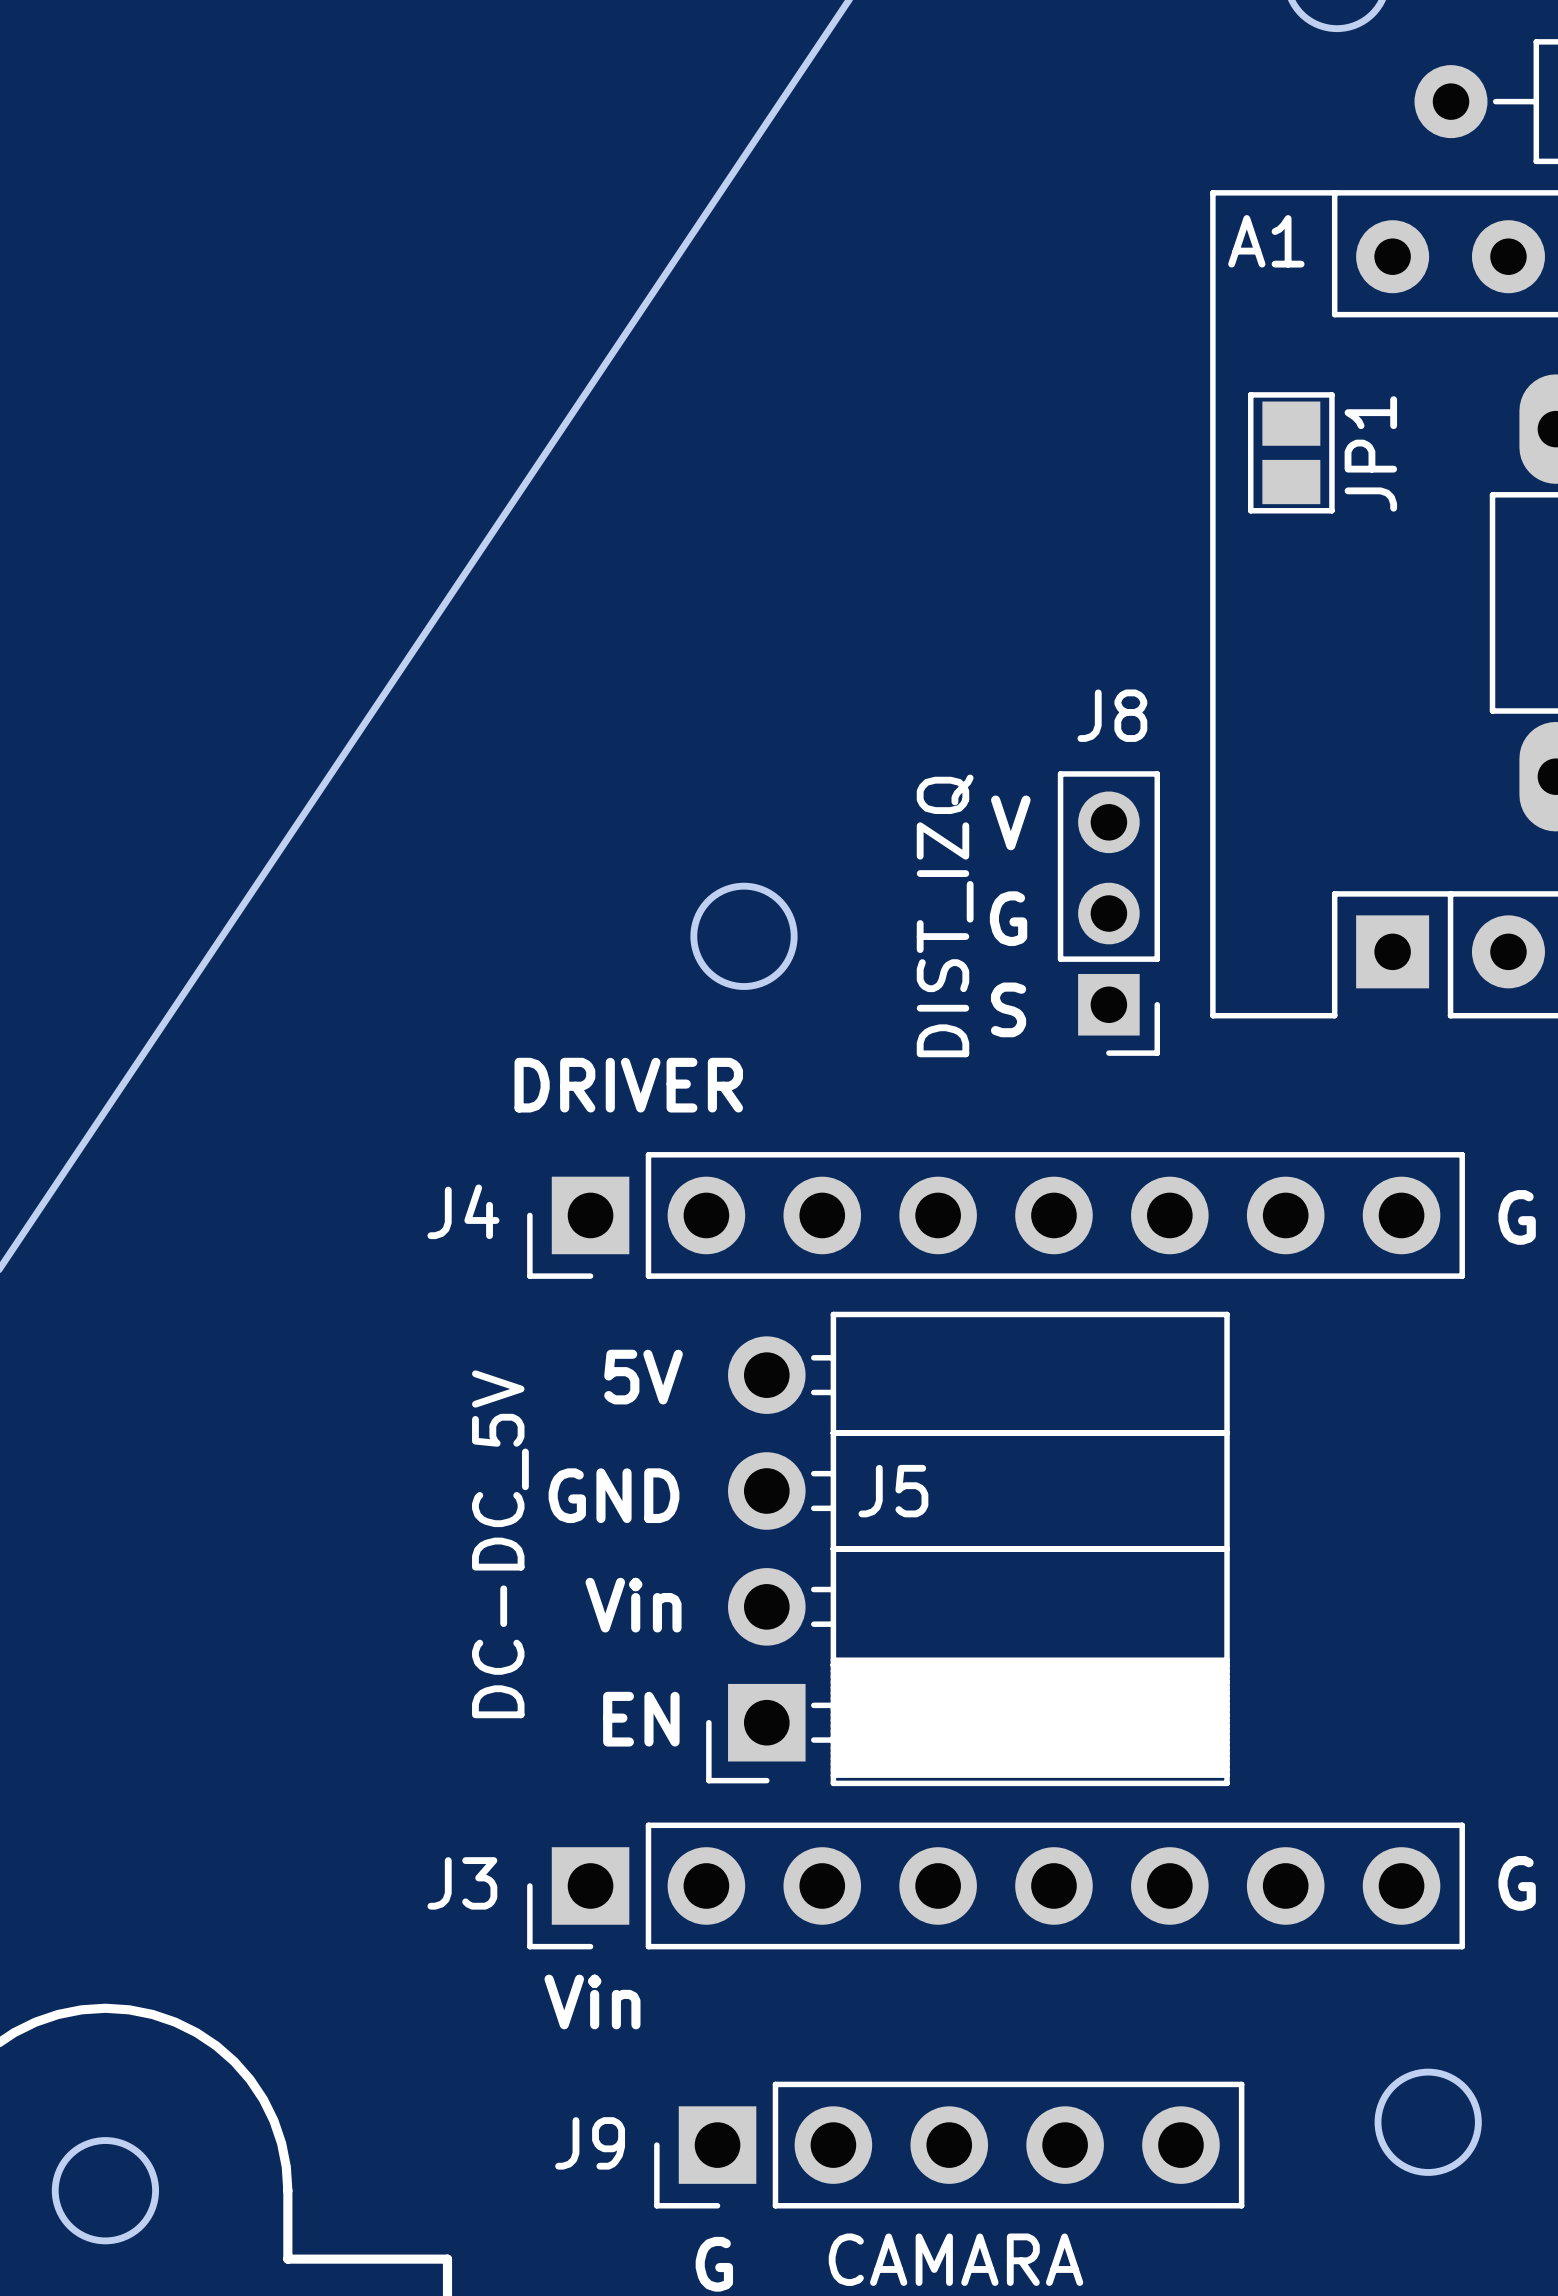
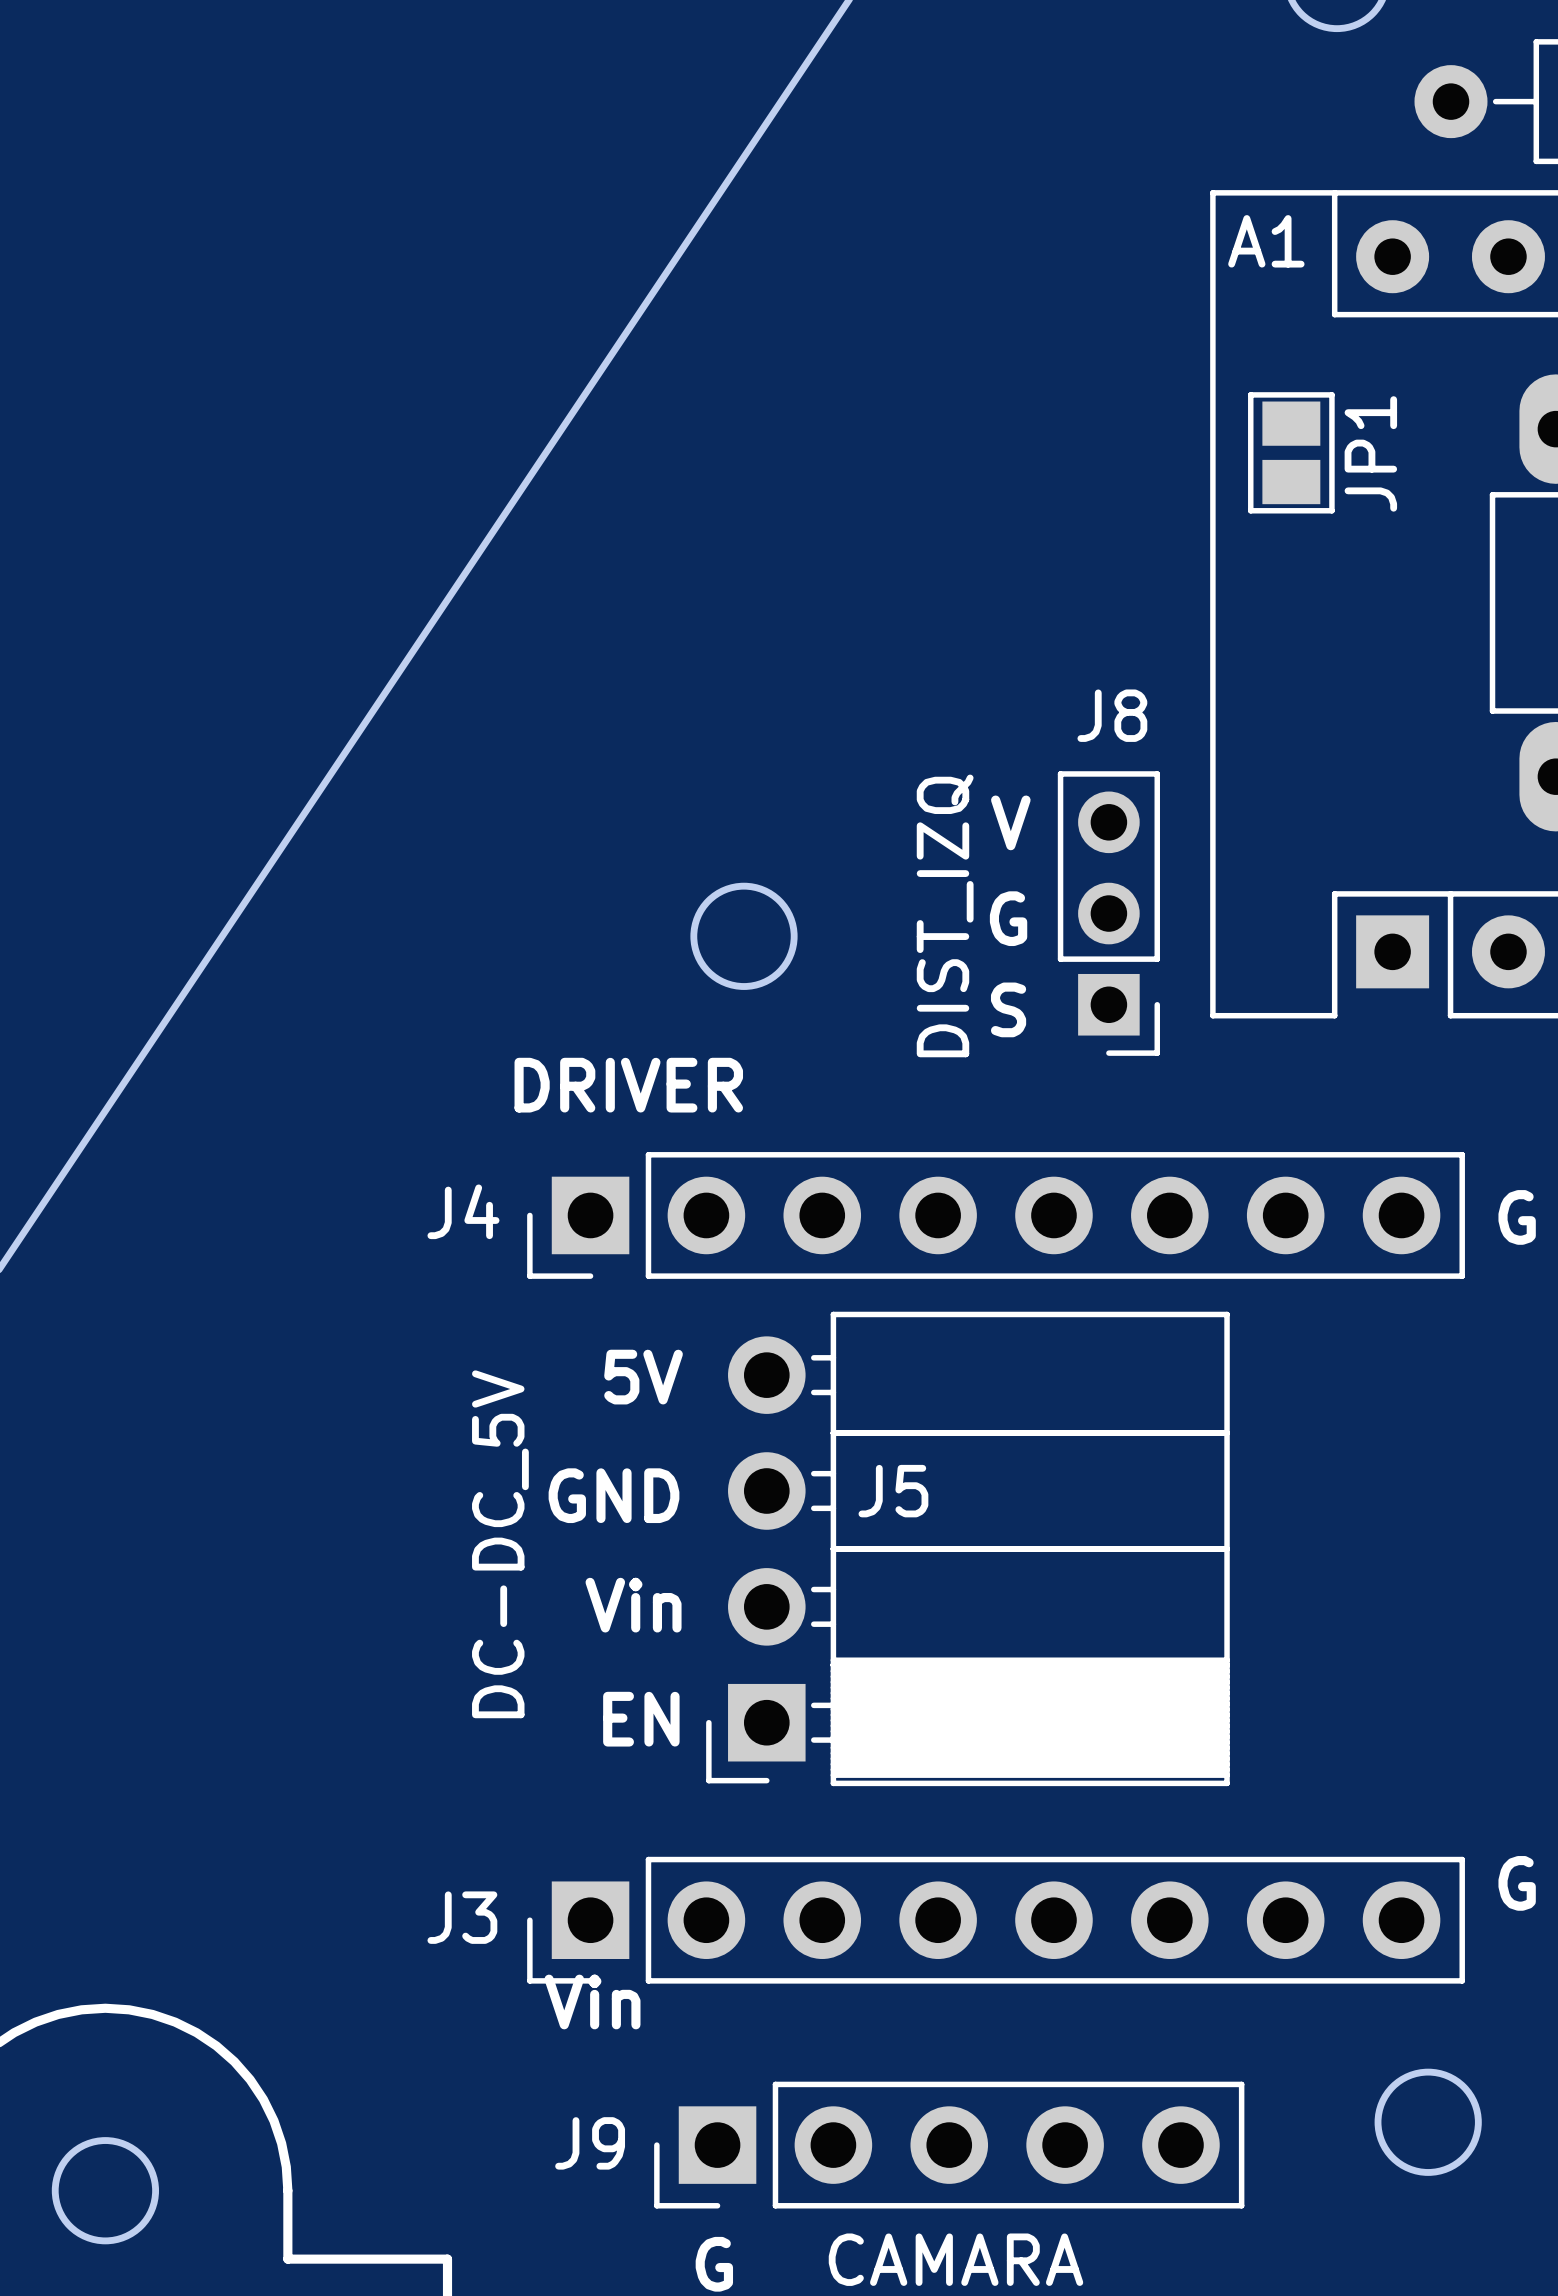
J3 position: (996, 1885) -> (996, 1920)

